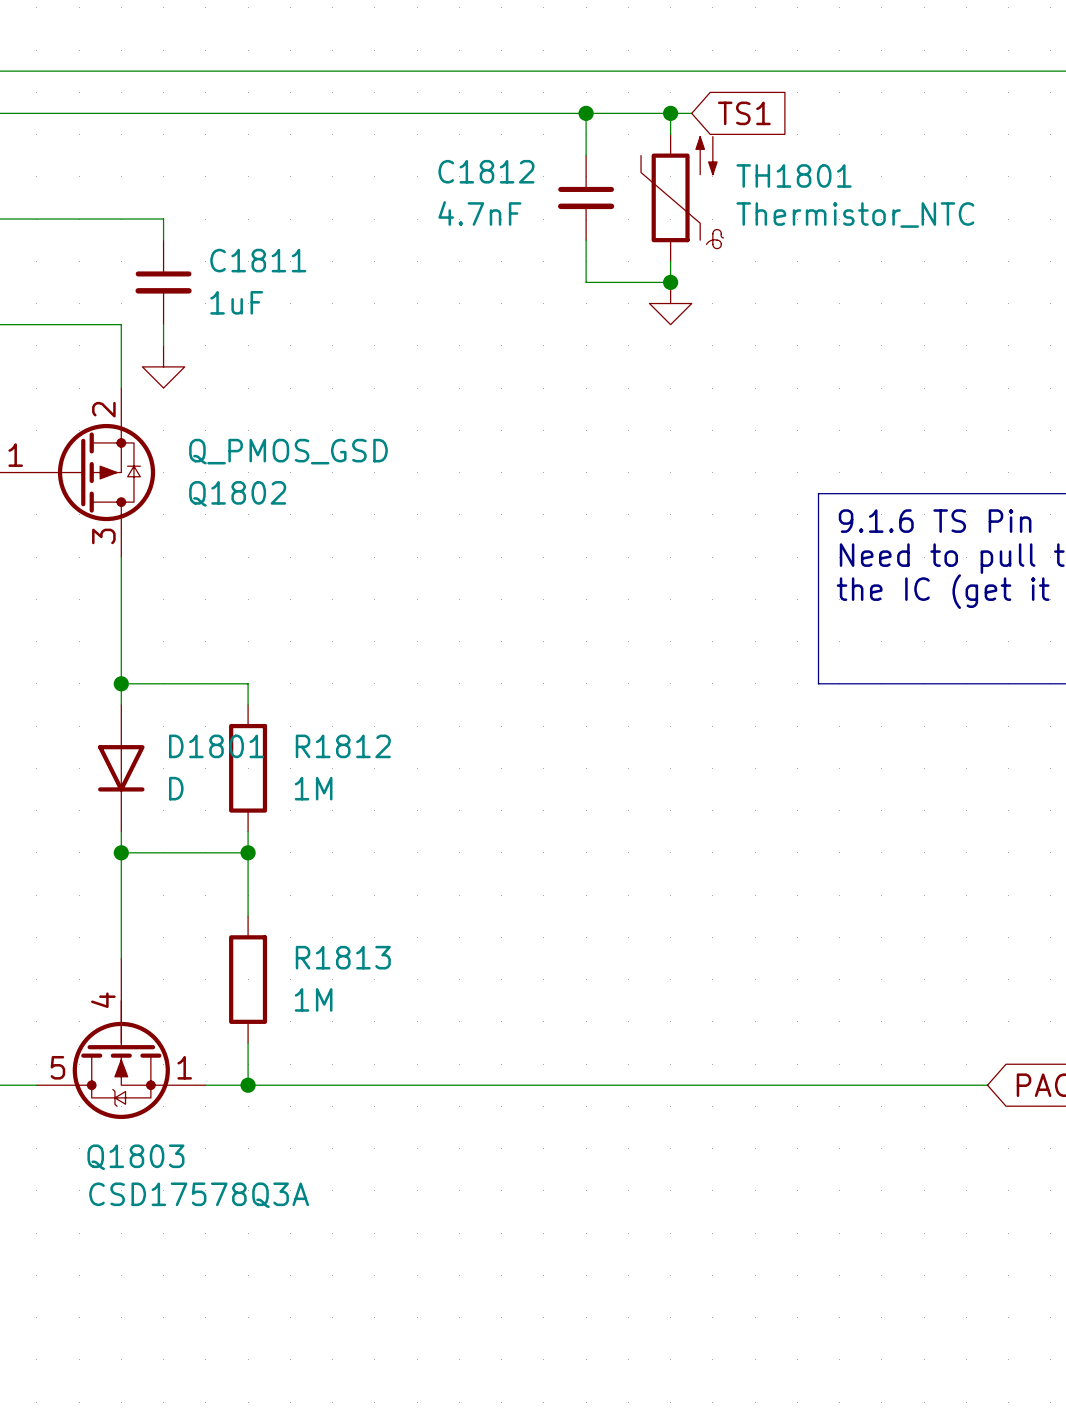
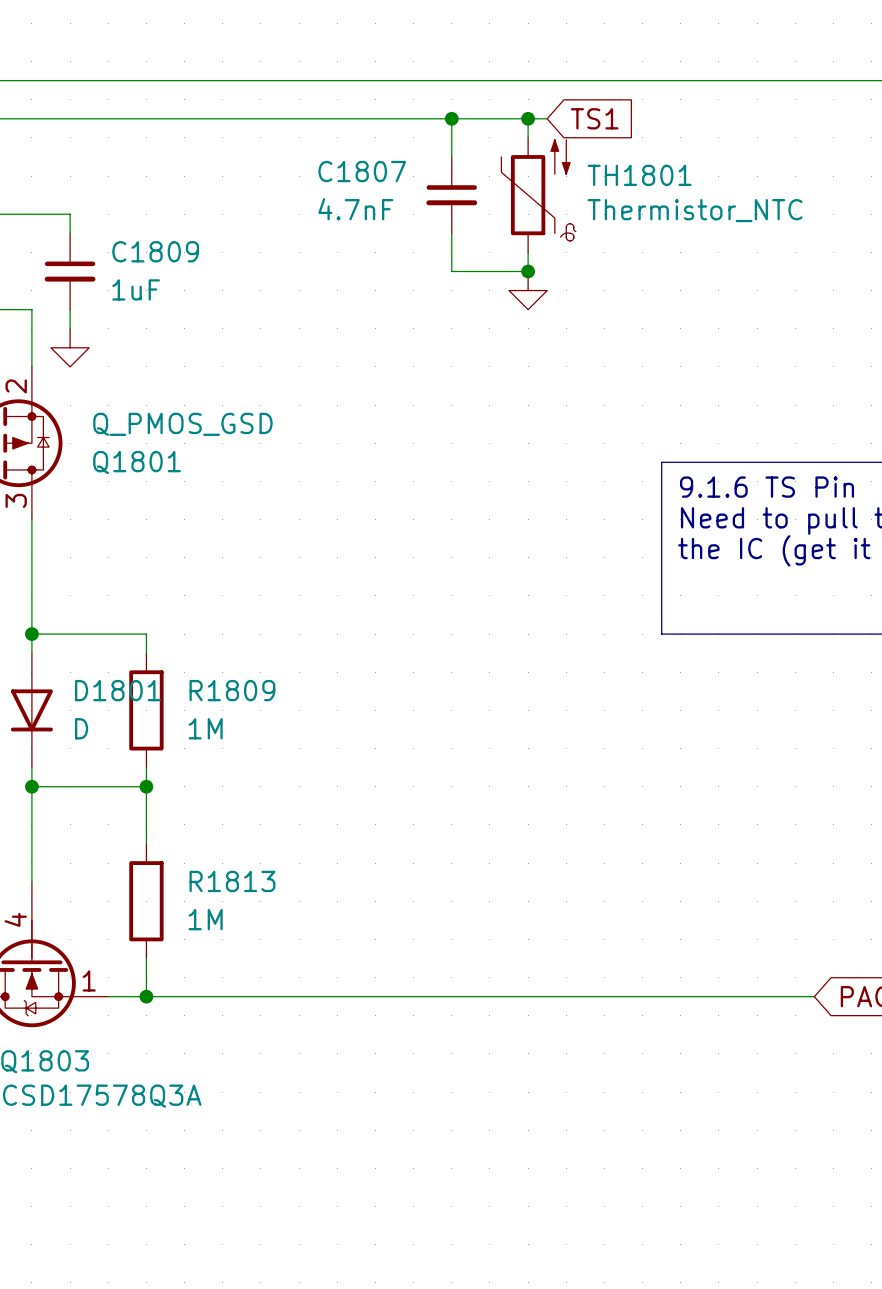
C1812 name: C1812 (486, 171) -> C1807 (362, 171)
C1811 name: C1811 (258, 260) -> C1809 (155, 251)
Q1802 name: Q1802 (237, 493) -> Q1801 (137, 462)
R1812 name: R1812 (343, 746) -> R1809 (232, 690)

